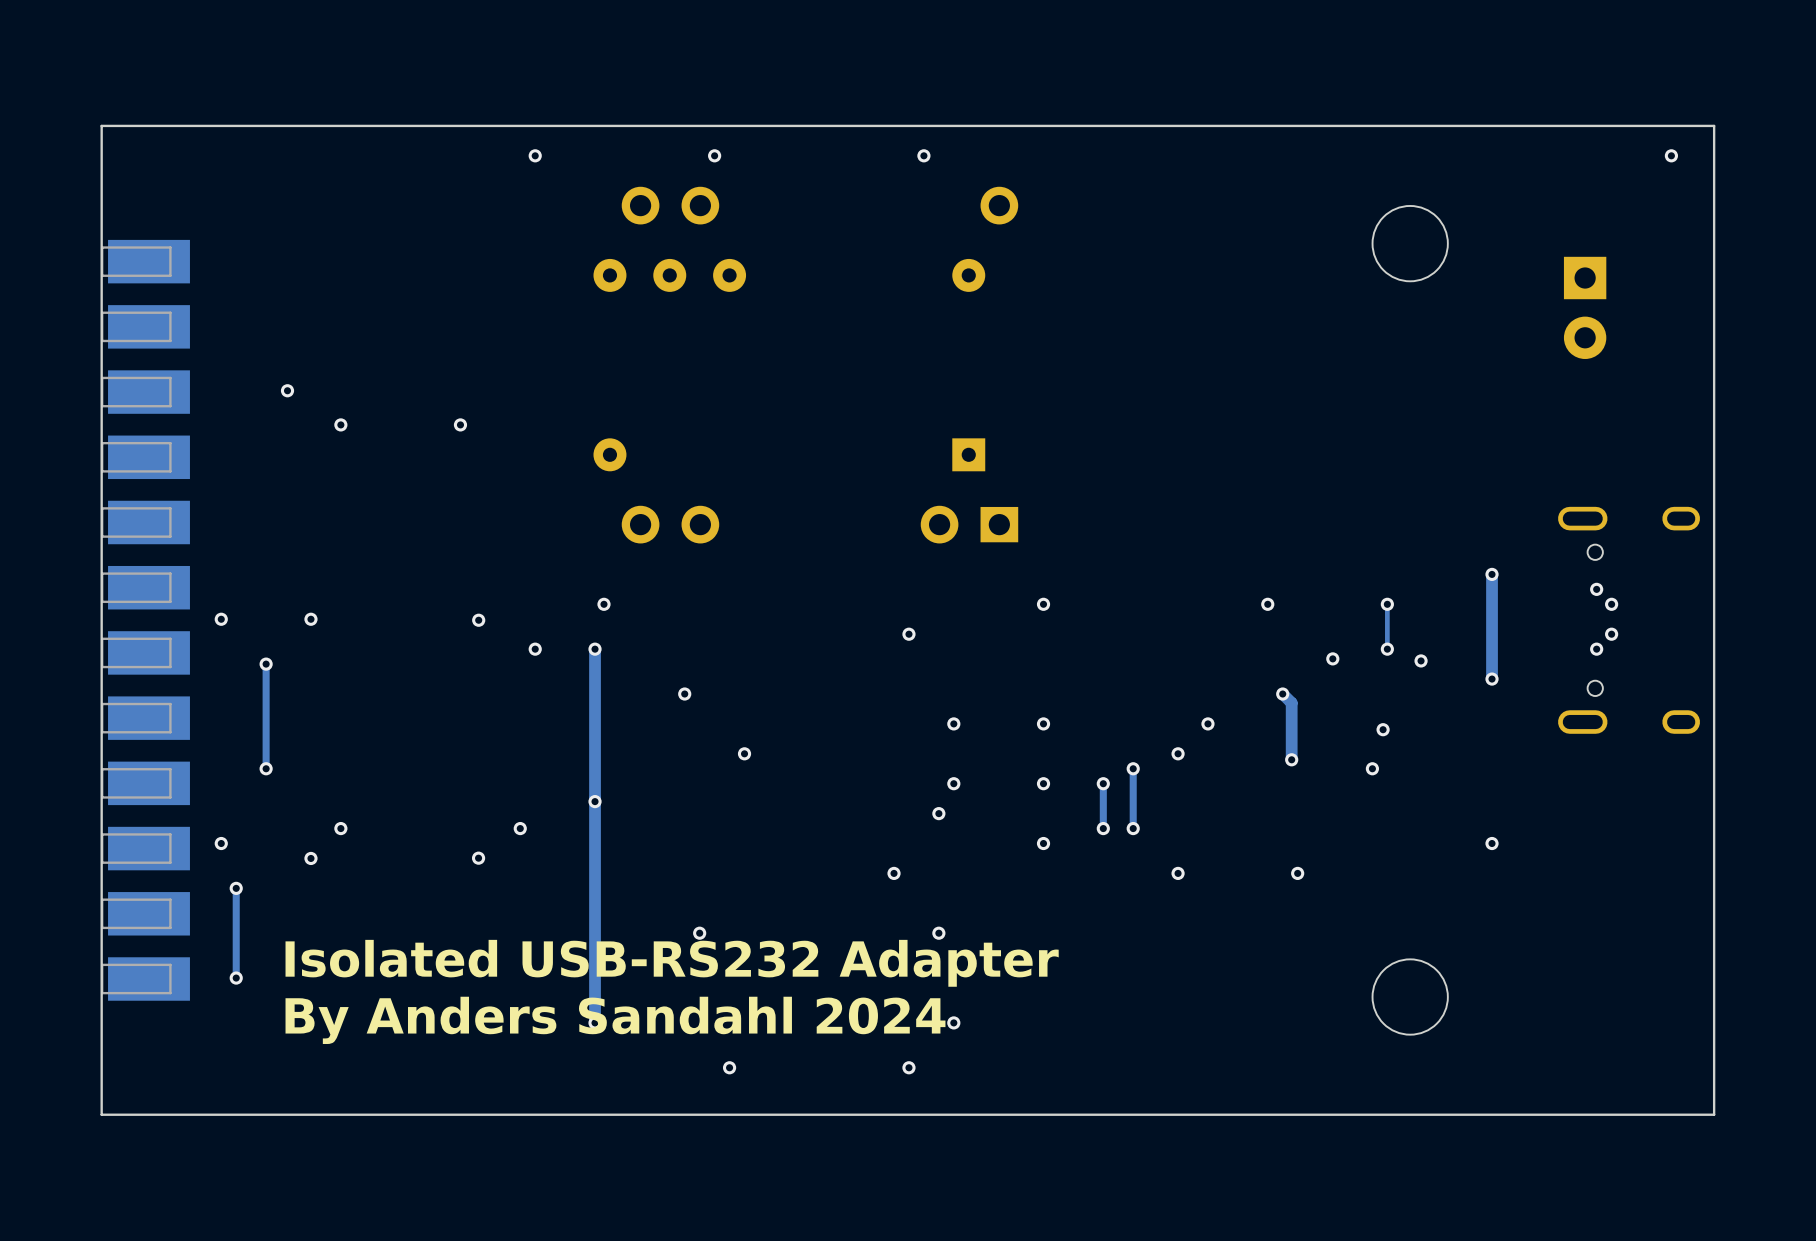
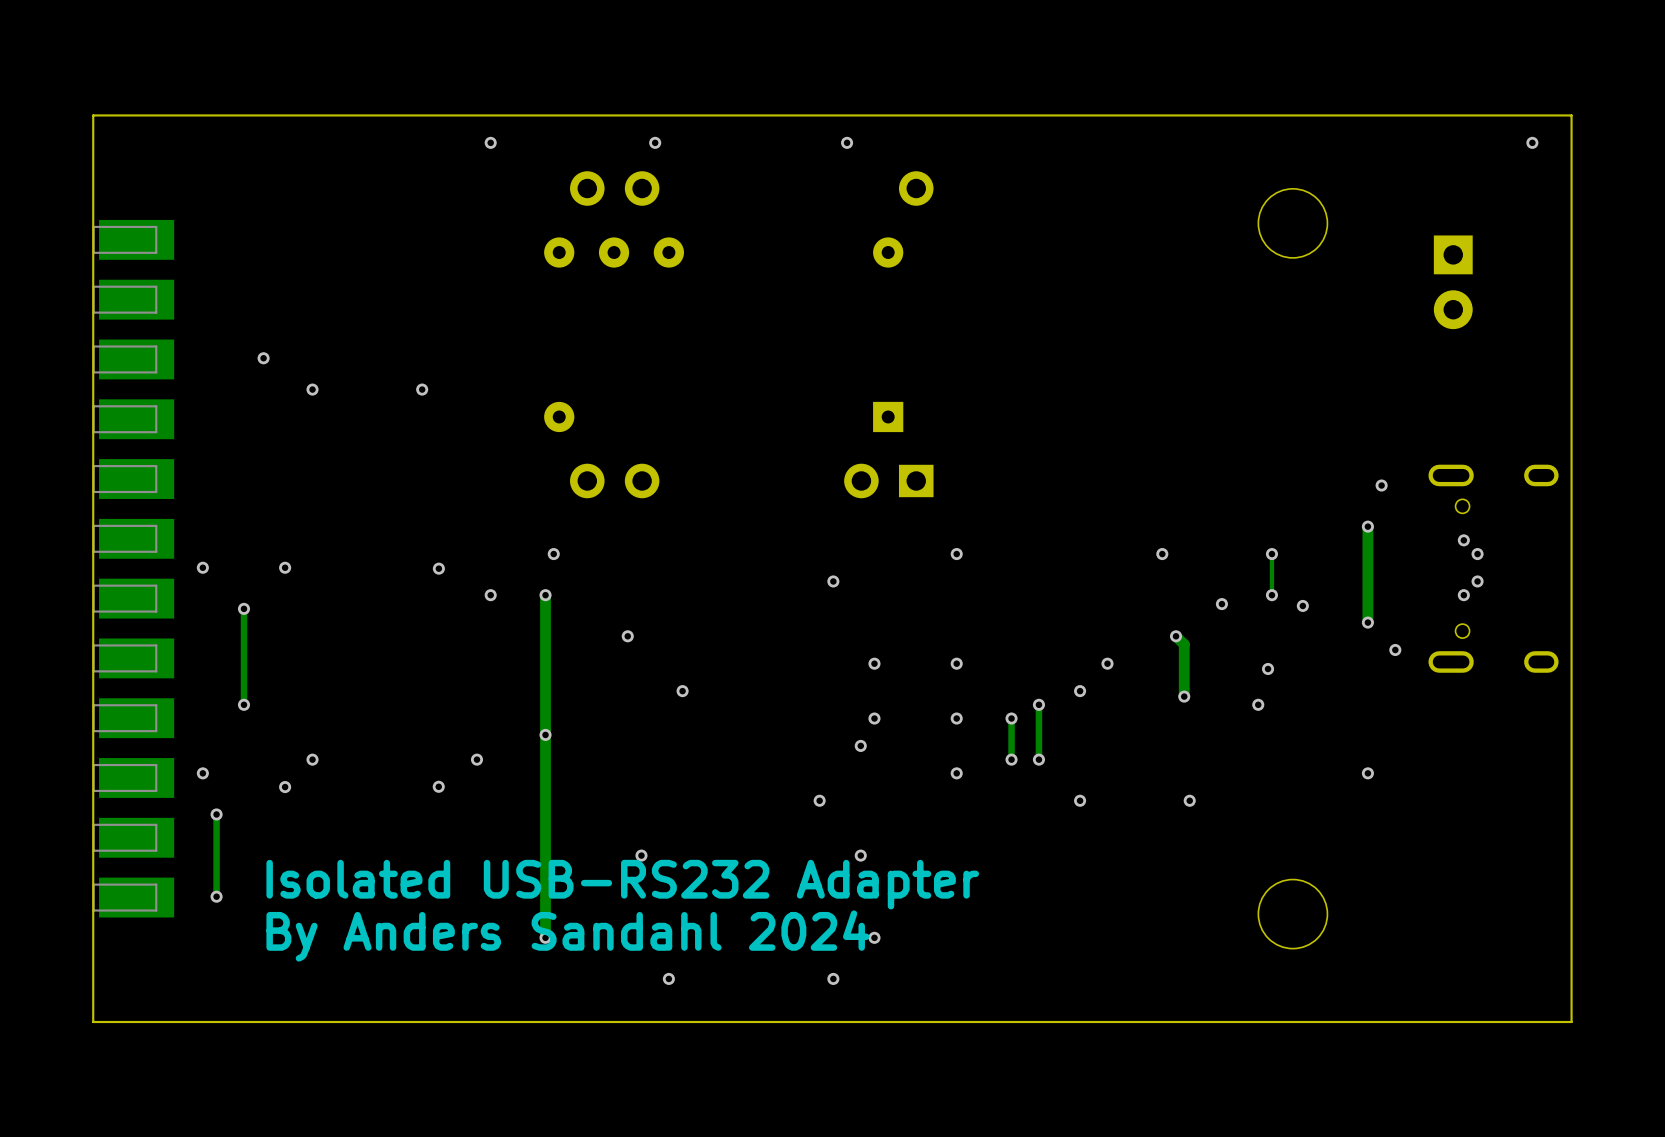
via: none -> (1381, 485)
via: none -> (1395, 649)

